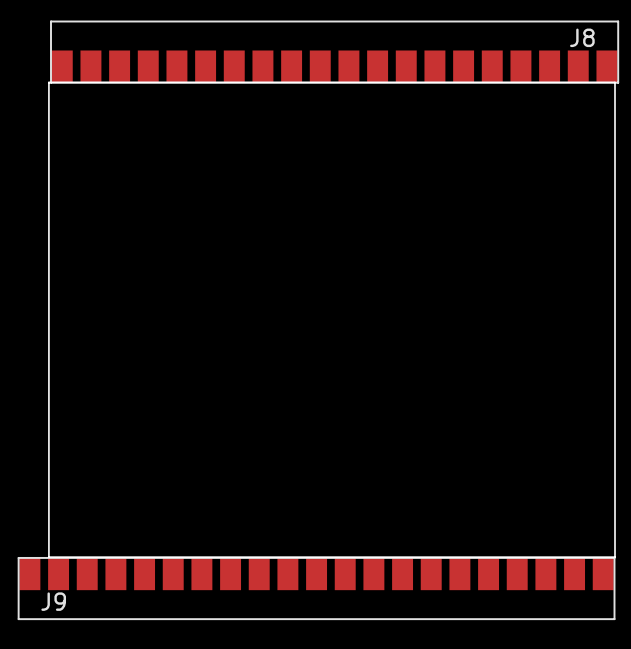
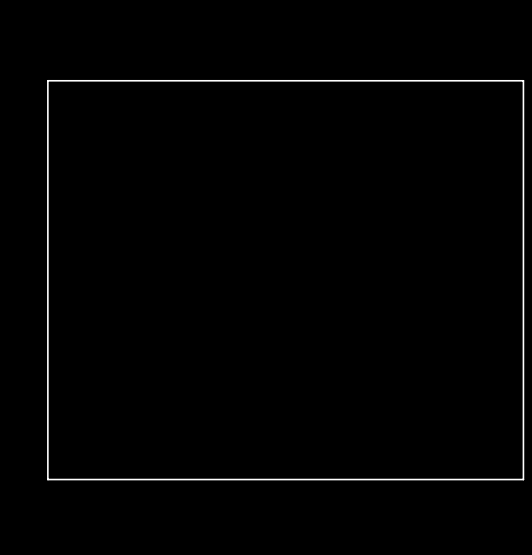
J8: (334, 52) -> none
J9: (316, 588) -> none

